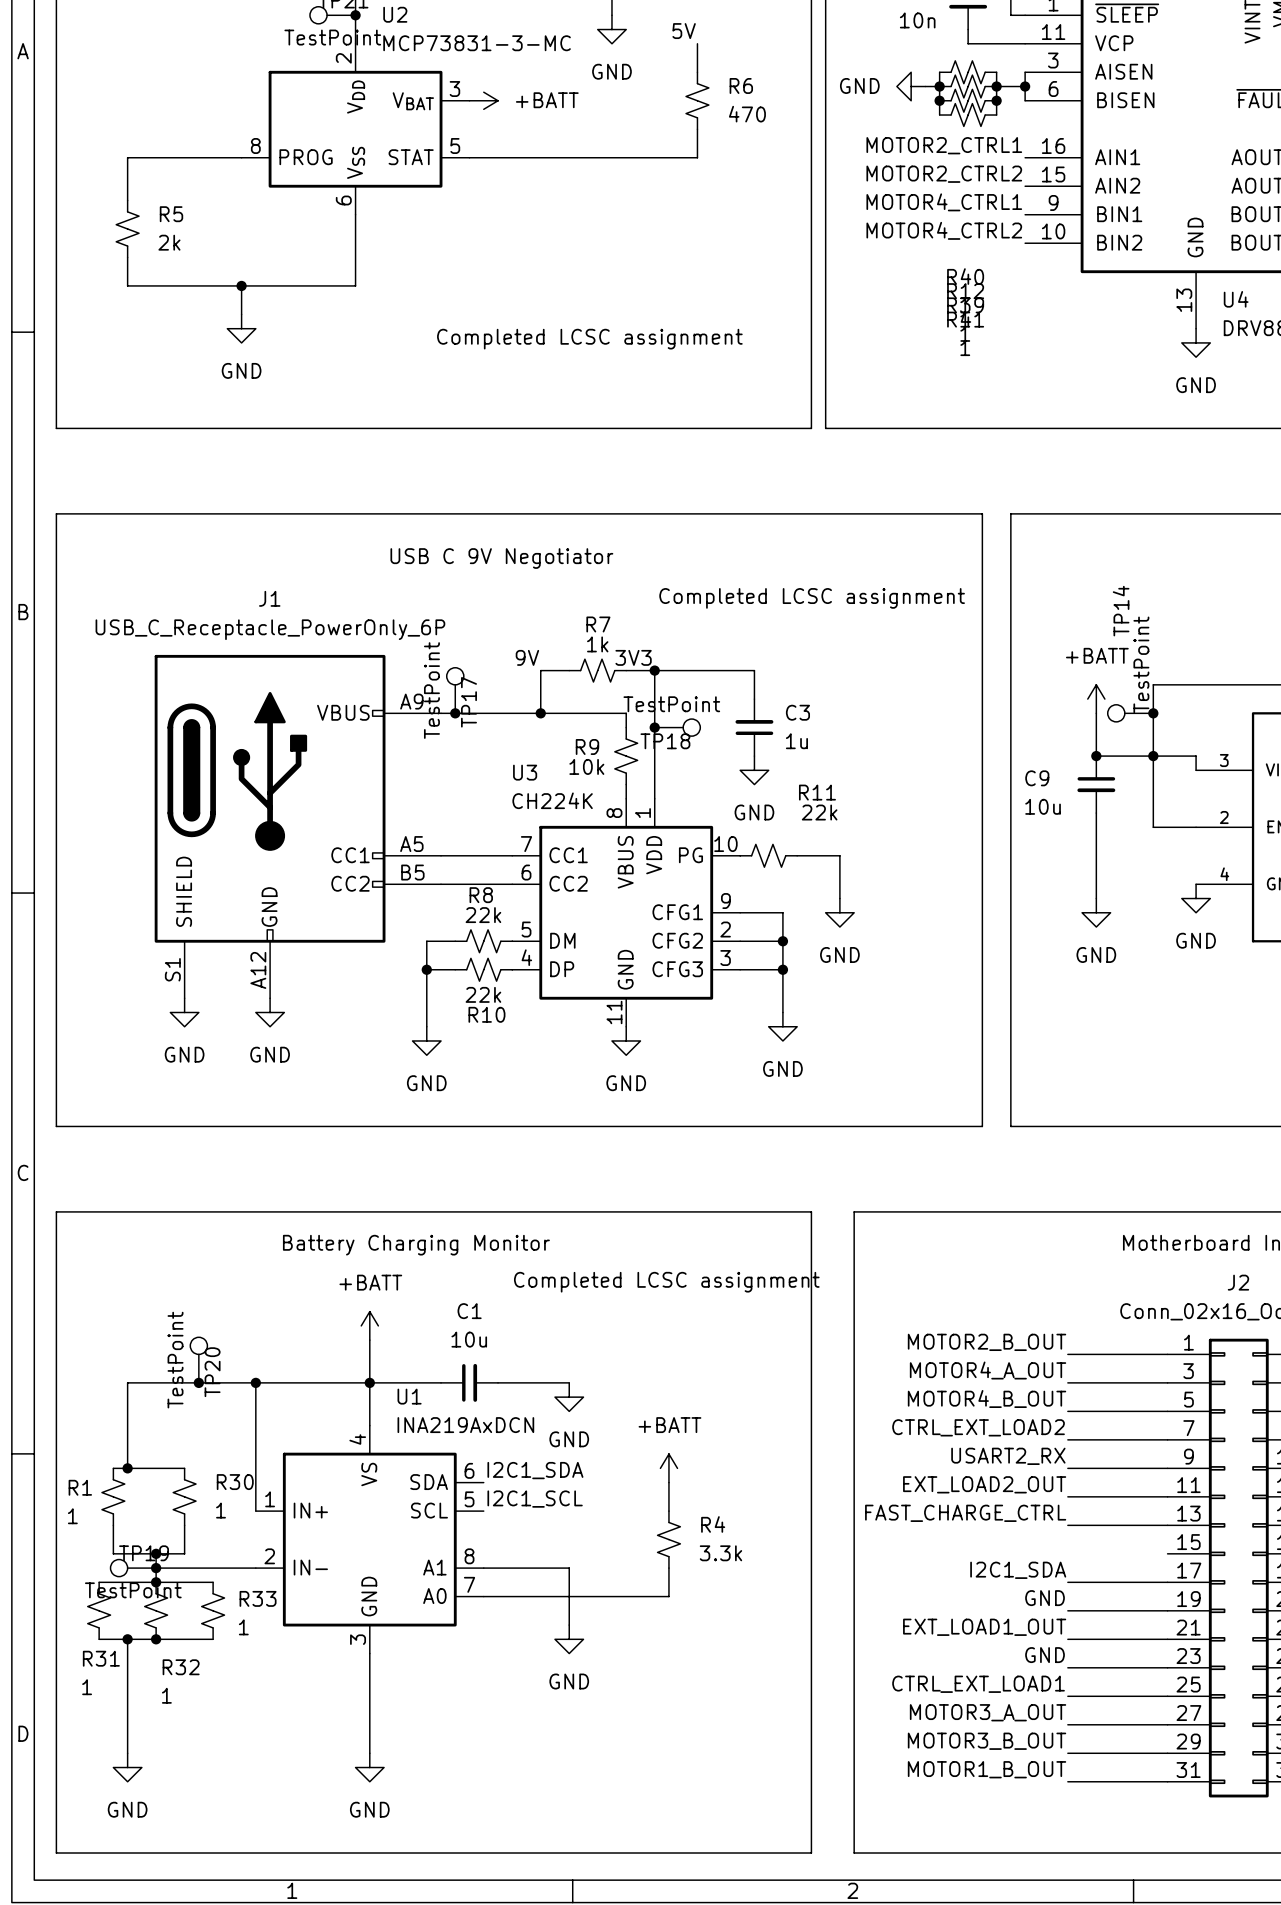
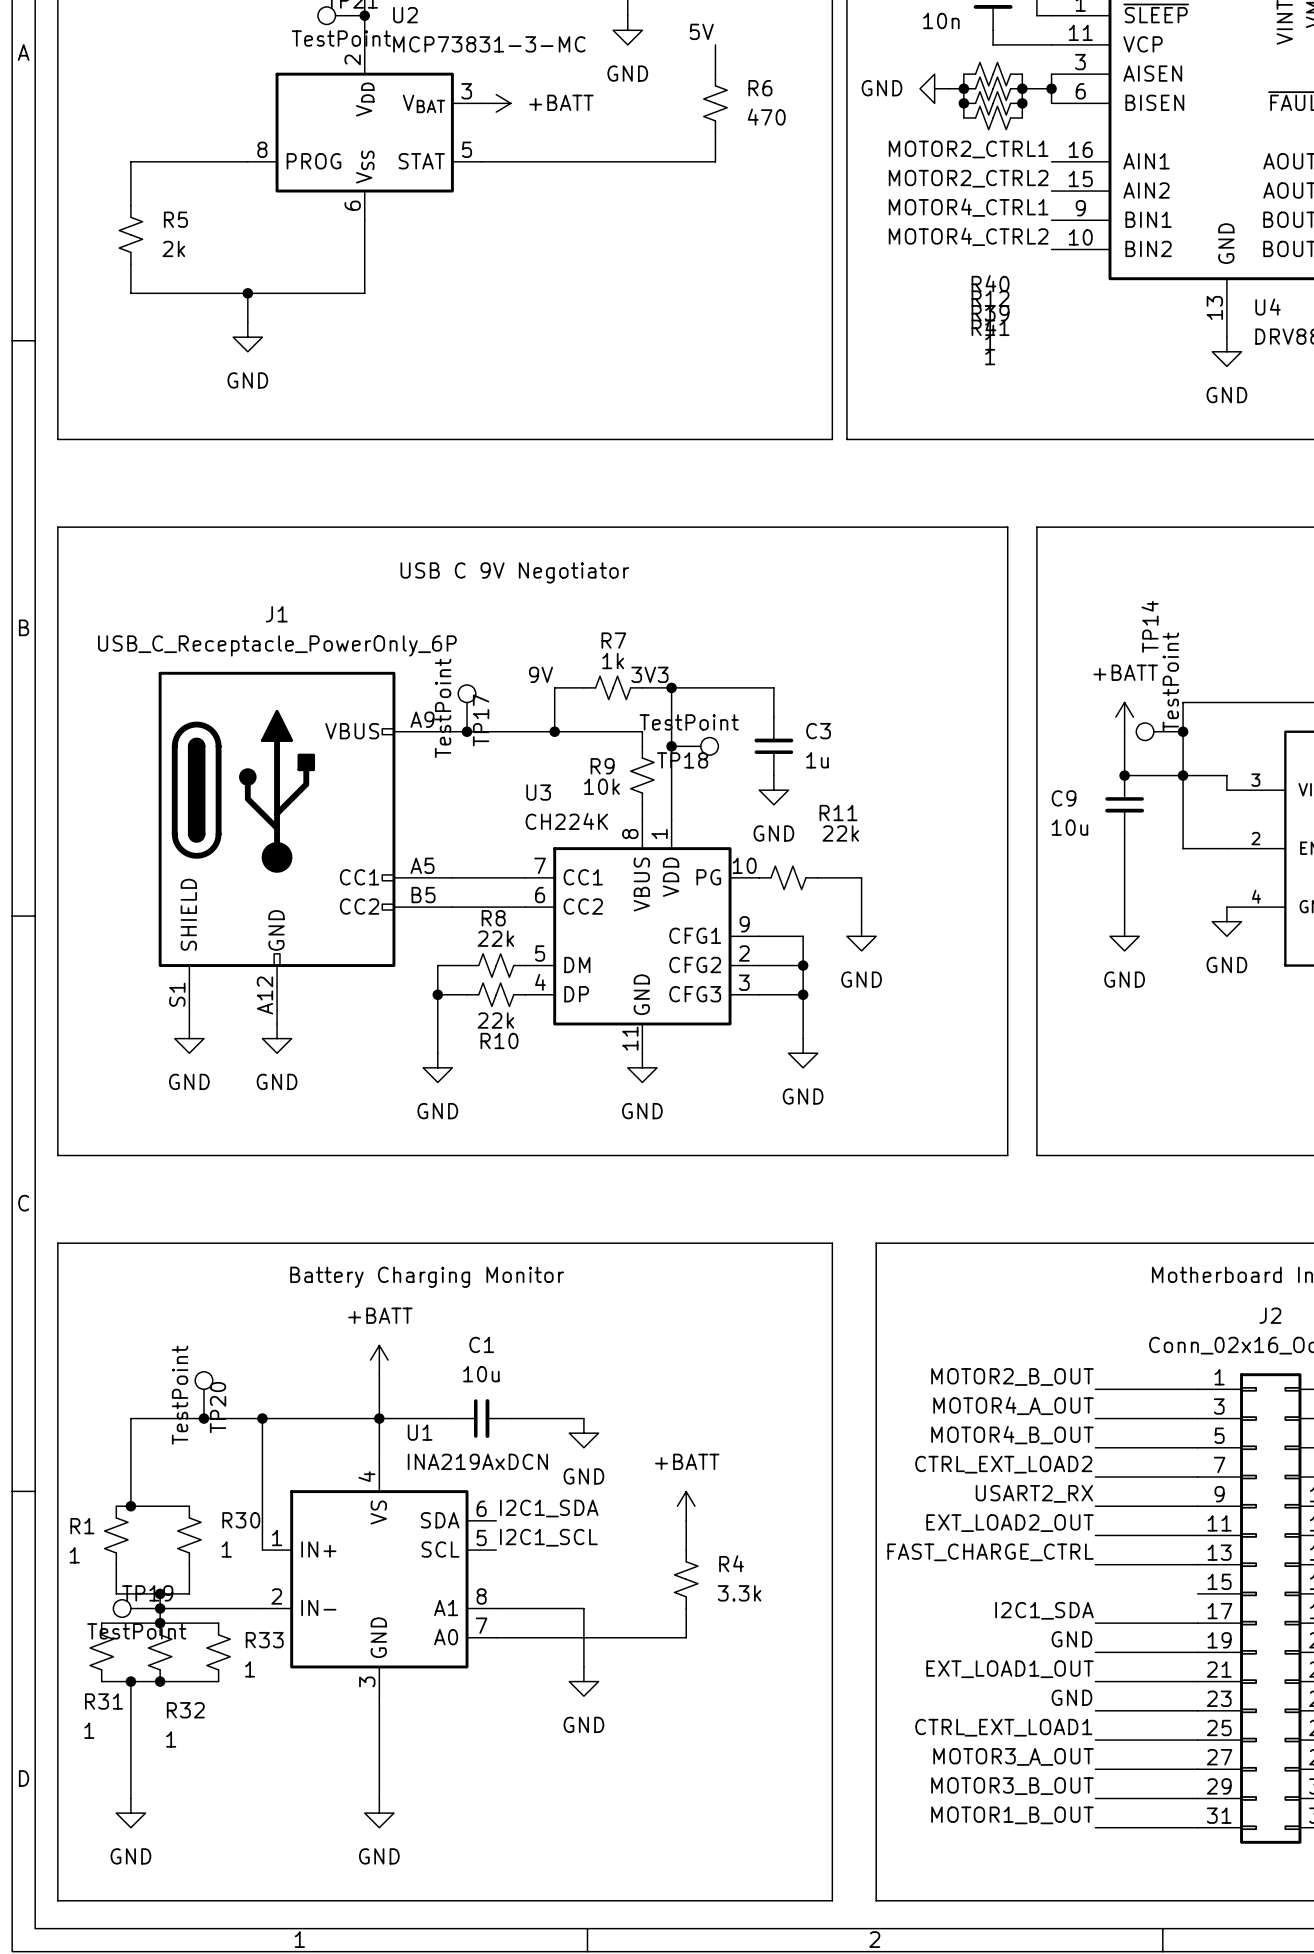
text: Completed LCSC assignment (589, 339) -> none
text: Completed LCSC assignment (812, 598) -> none
text: Completed LCSC assignment (666, 1282) -> none

